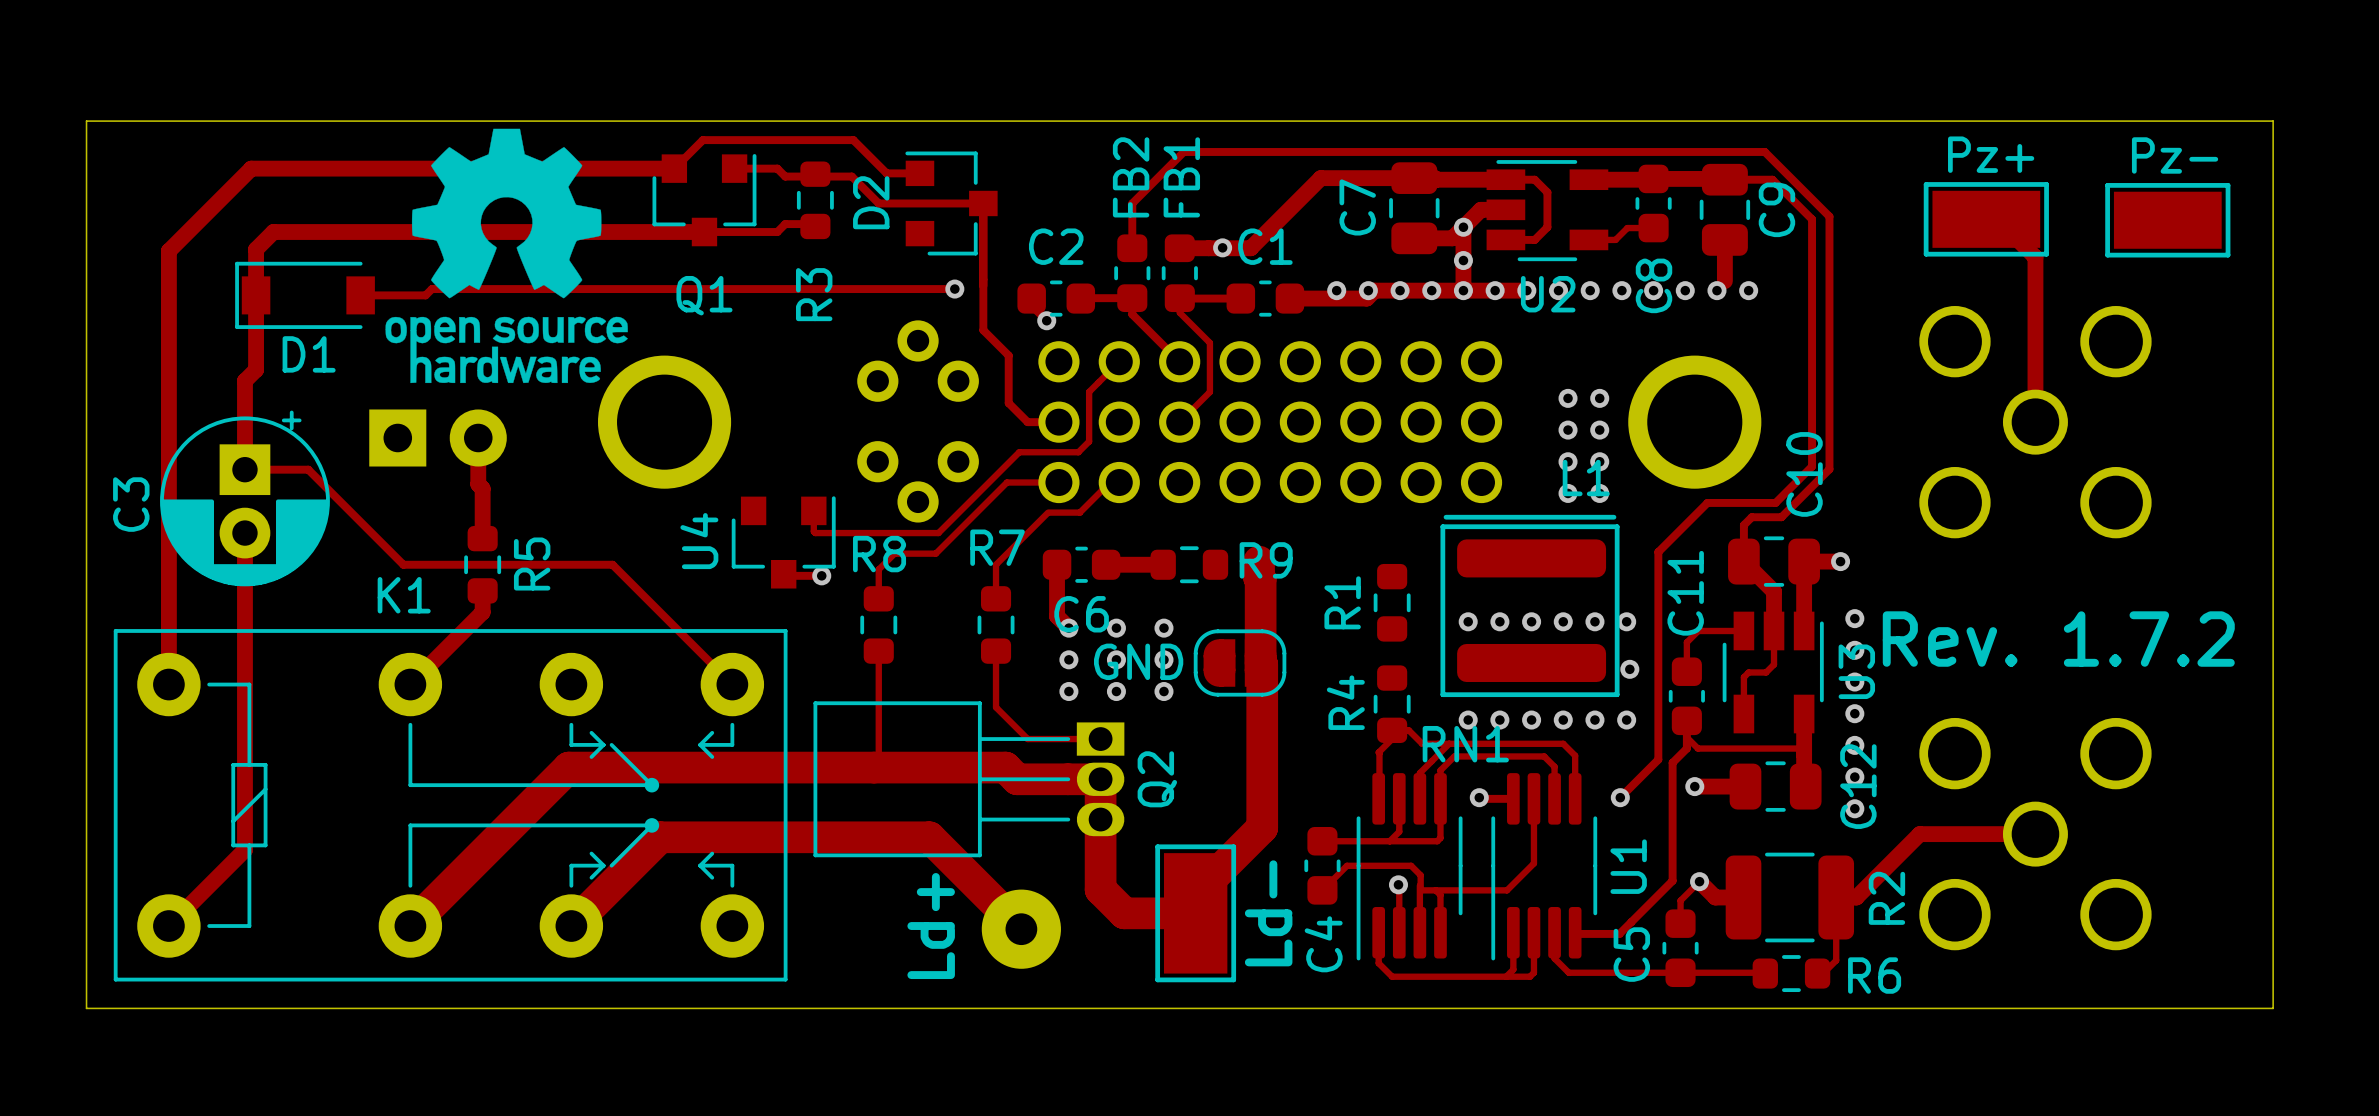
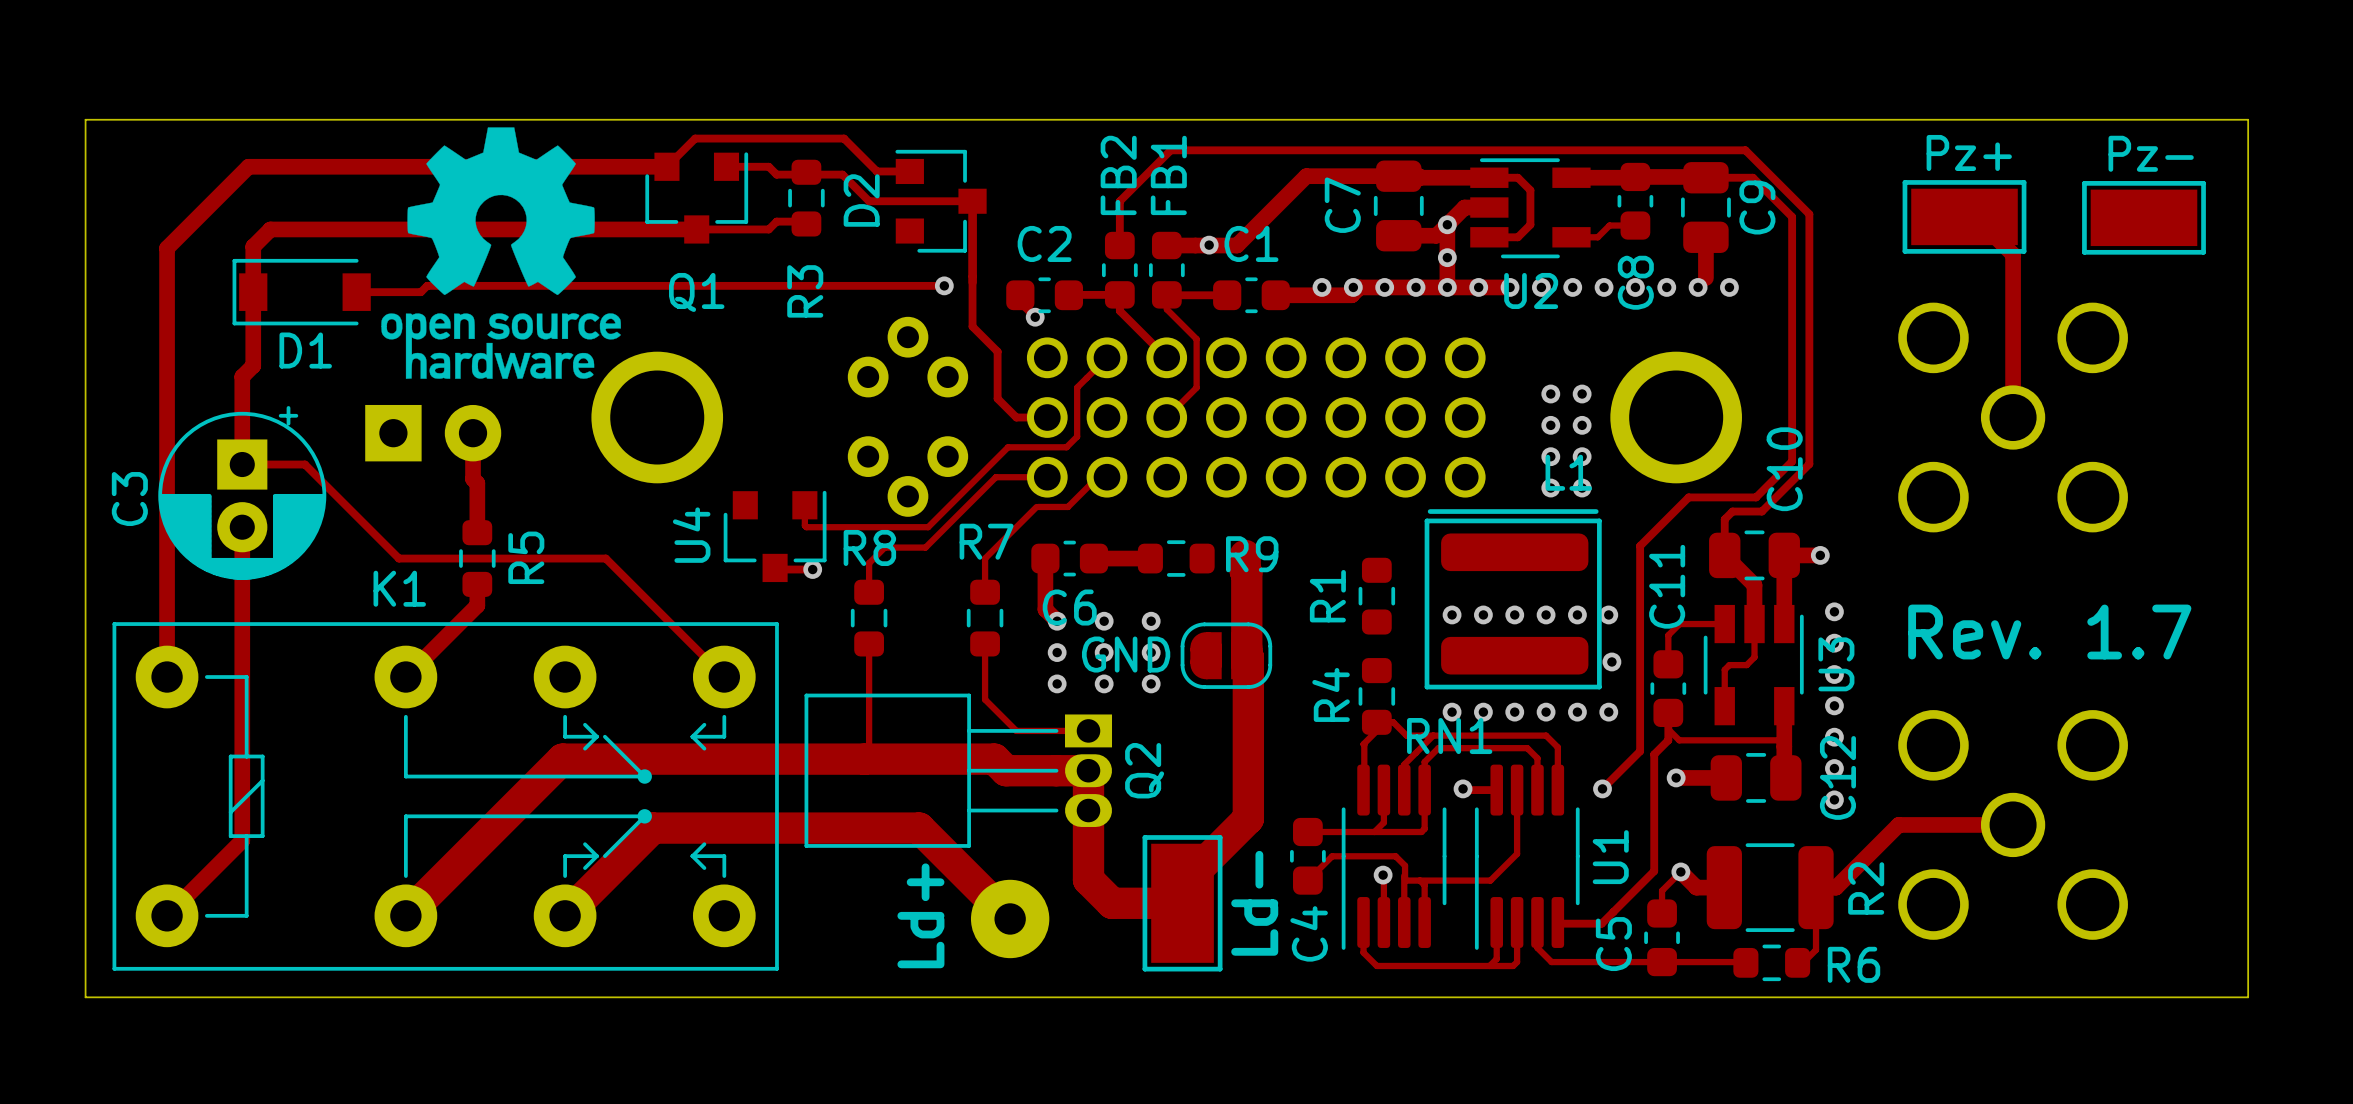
text: Rev. 1.7.2 (2058, 639) -> Rev. 1.7 (2049, 632)

